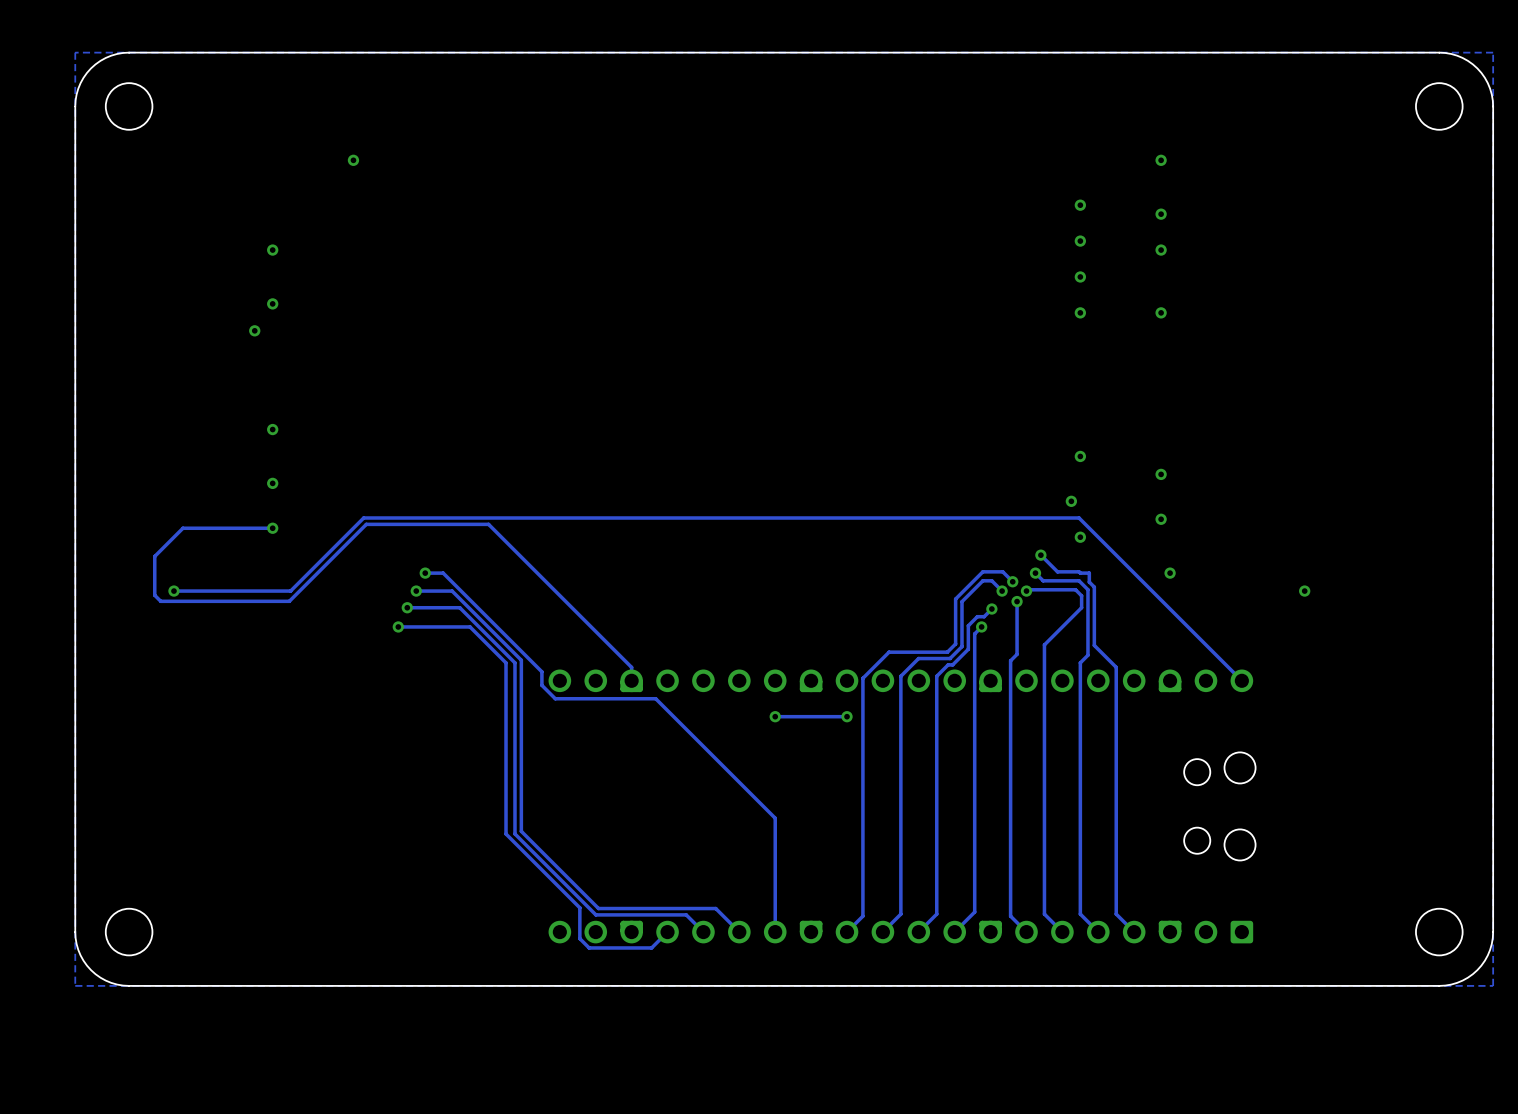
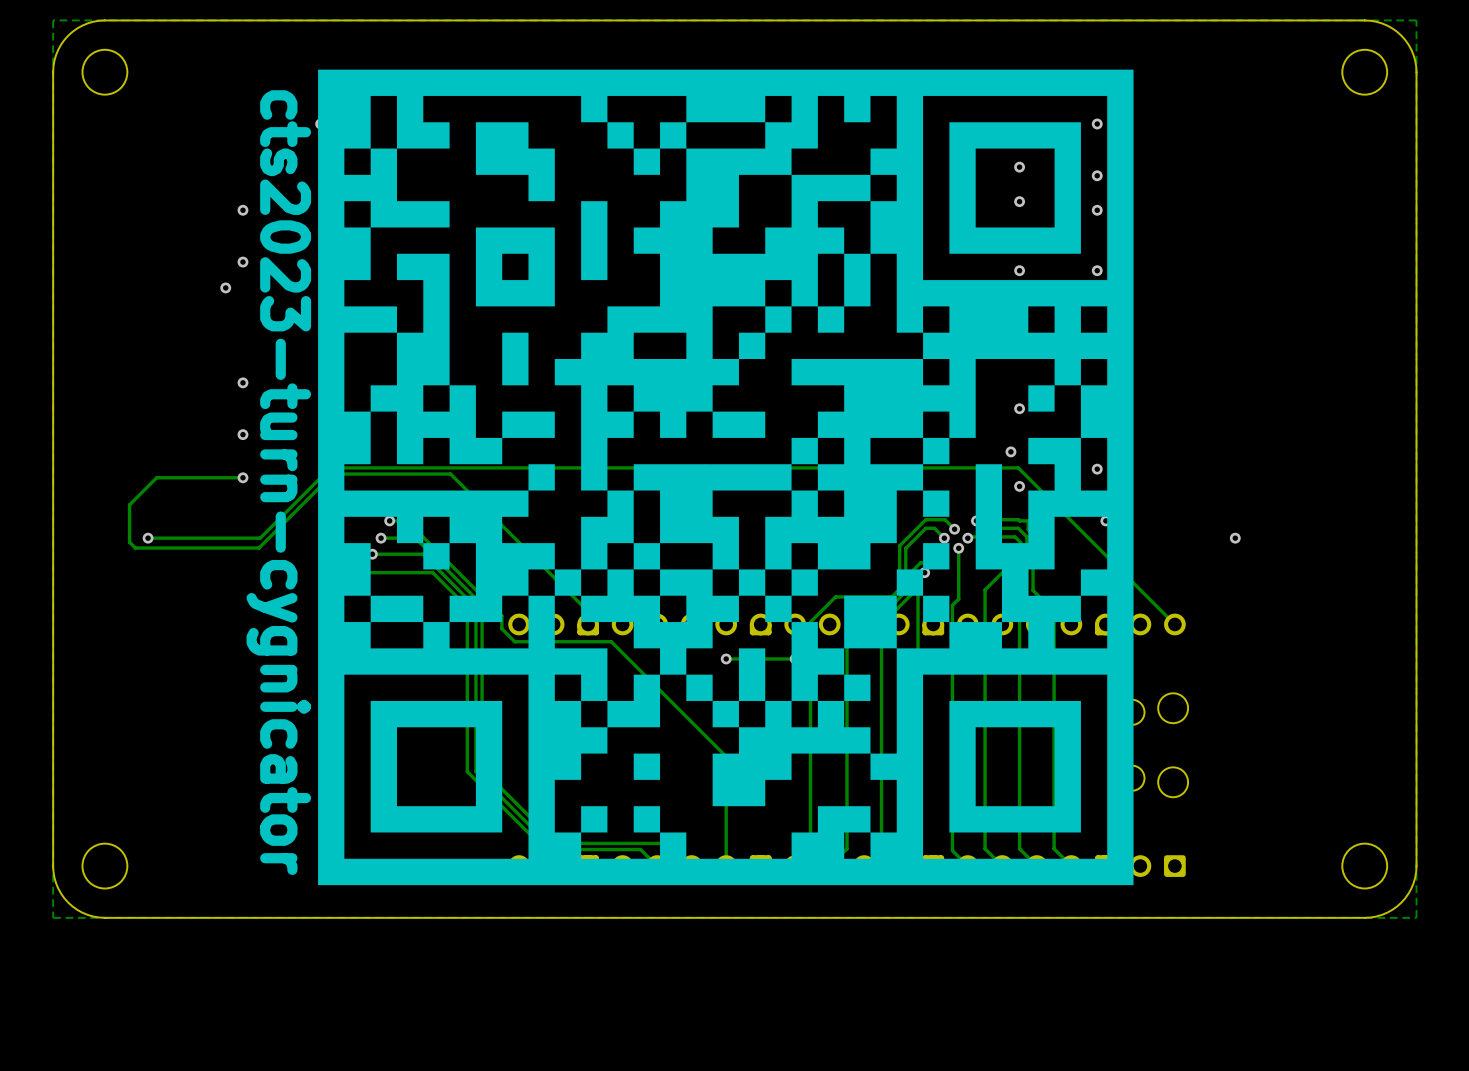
part: none -> (725, 477)
text: none -> cts2023-turn-cygnicator (278, 482)

